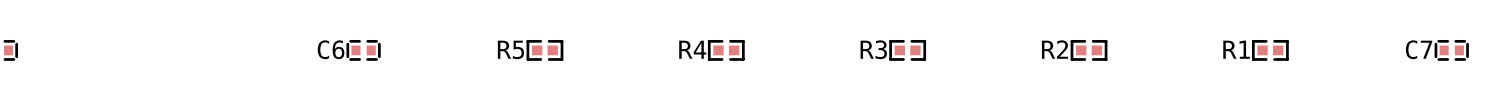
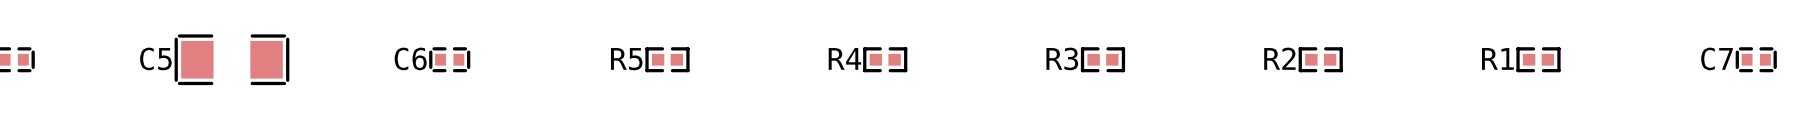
C5: none -> (231, 59)

